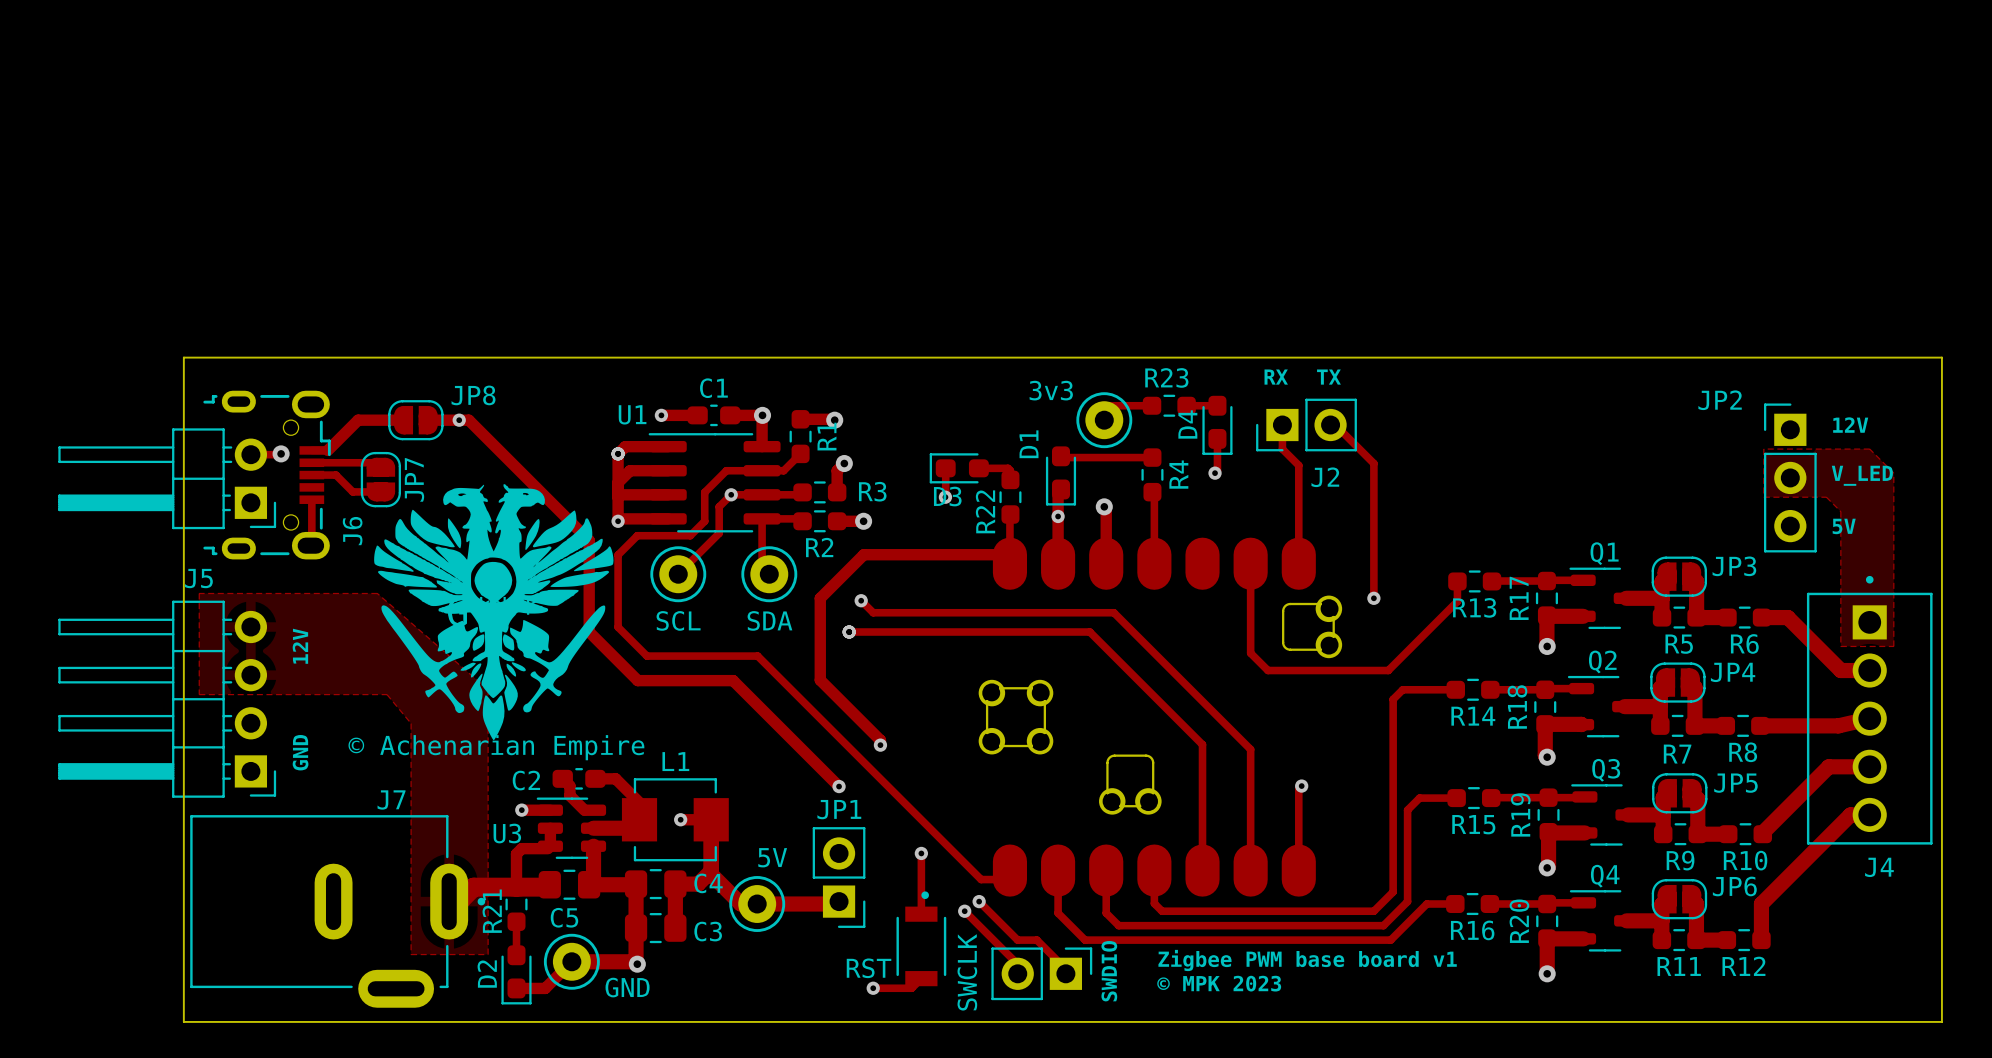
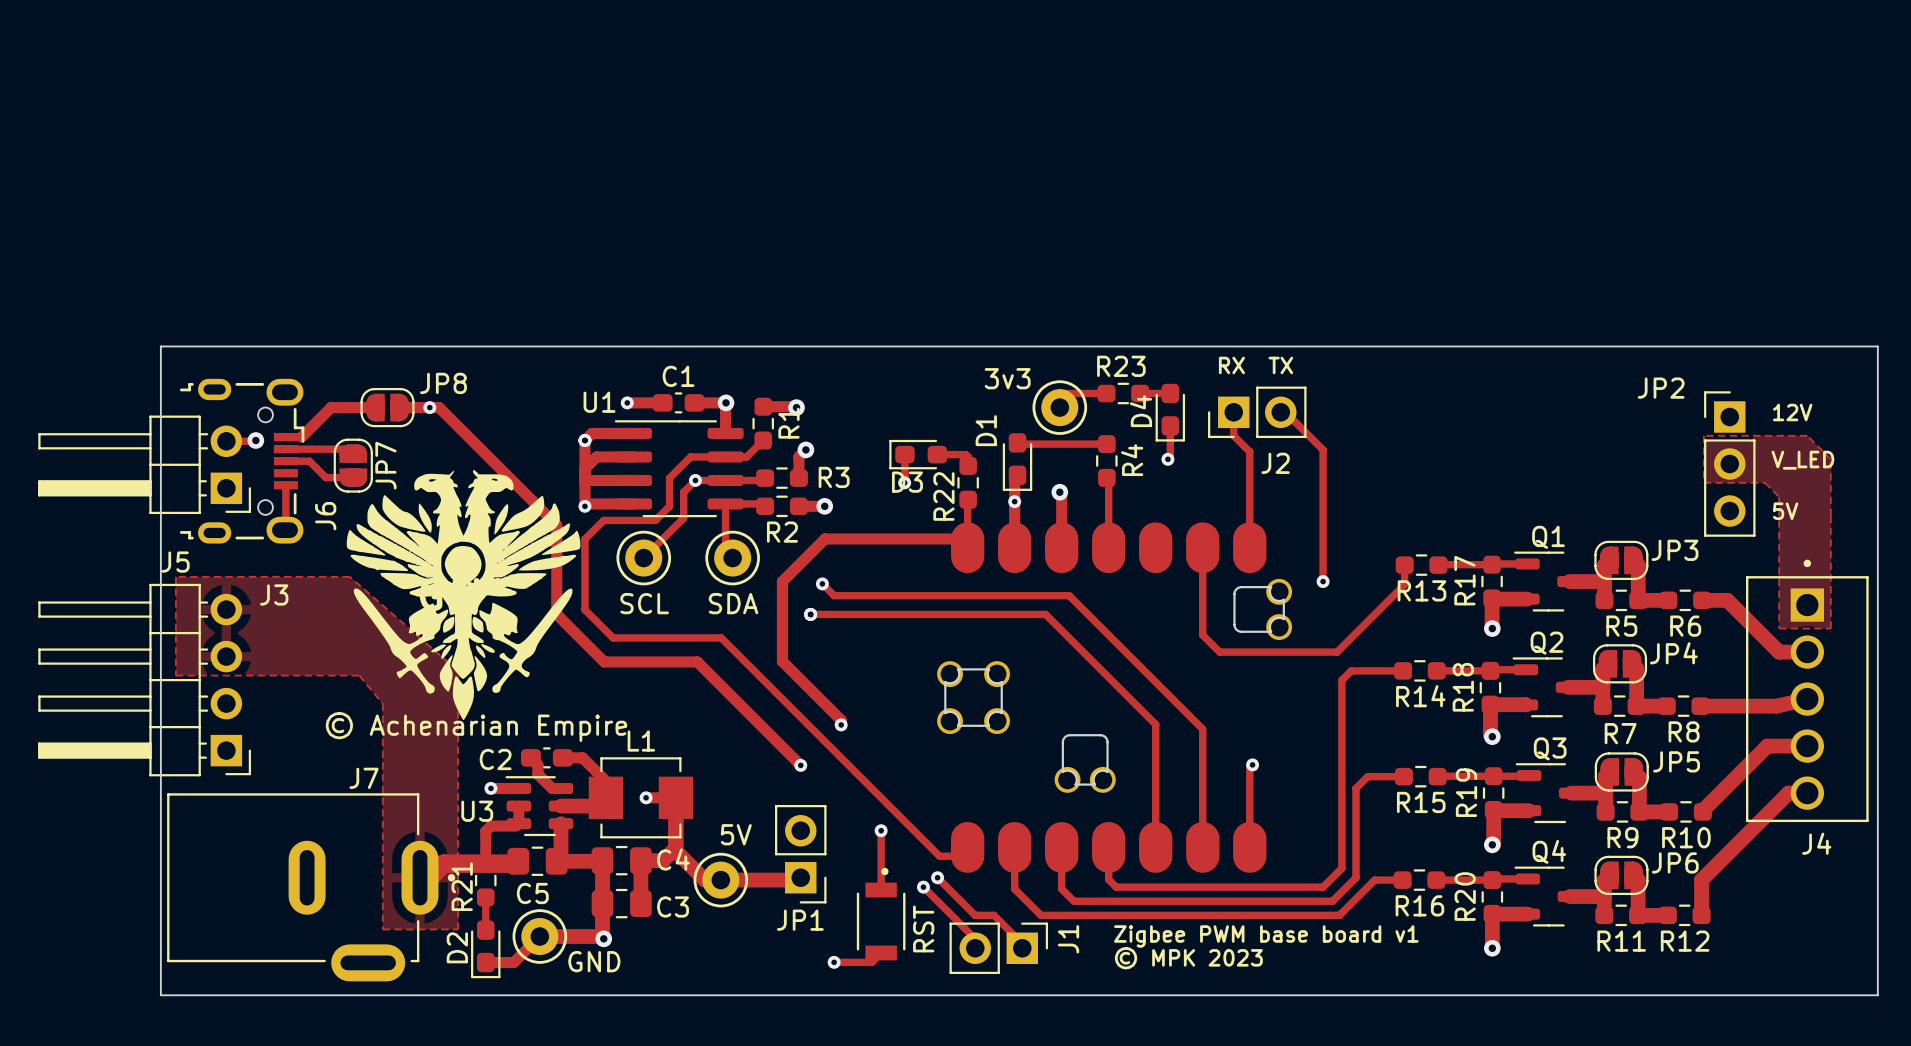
J3 name: none -> J3 (274, 594)
text: 12V (300, 646) -> none
text: GND (300, 752) -> none
JP1 name position: JP1 (839, 809) -> JP1 (800, 920)
J1 name: none -> J1 (1068, 939)
RST name rotation: 0° (869, 968) -> 90° counterclockwise (923, 928)
RST name position: RST (869, 968) -> RST (923, 928)
text: SWDIO (1109, 971) -> none
text: SWCLK (967, 972) -> none

